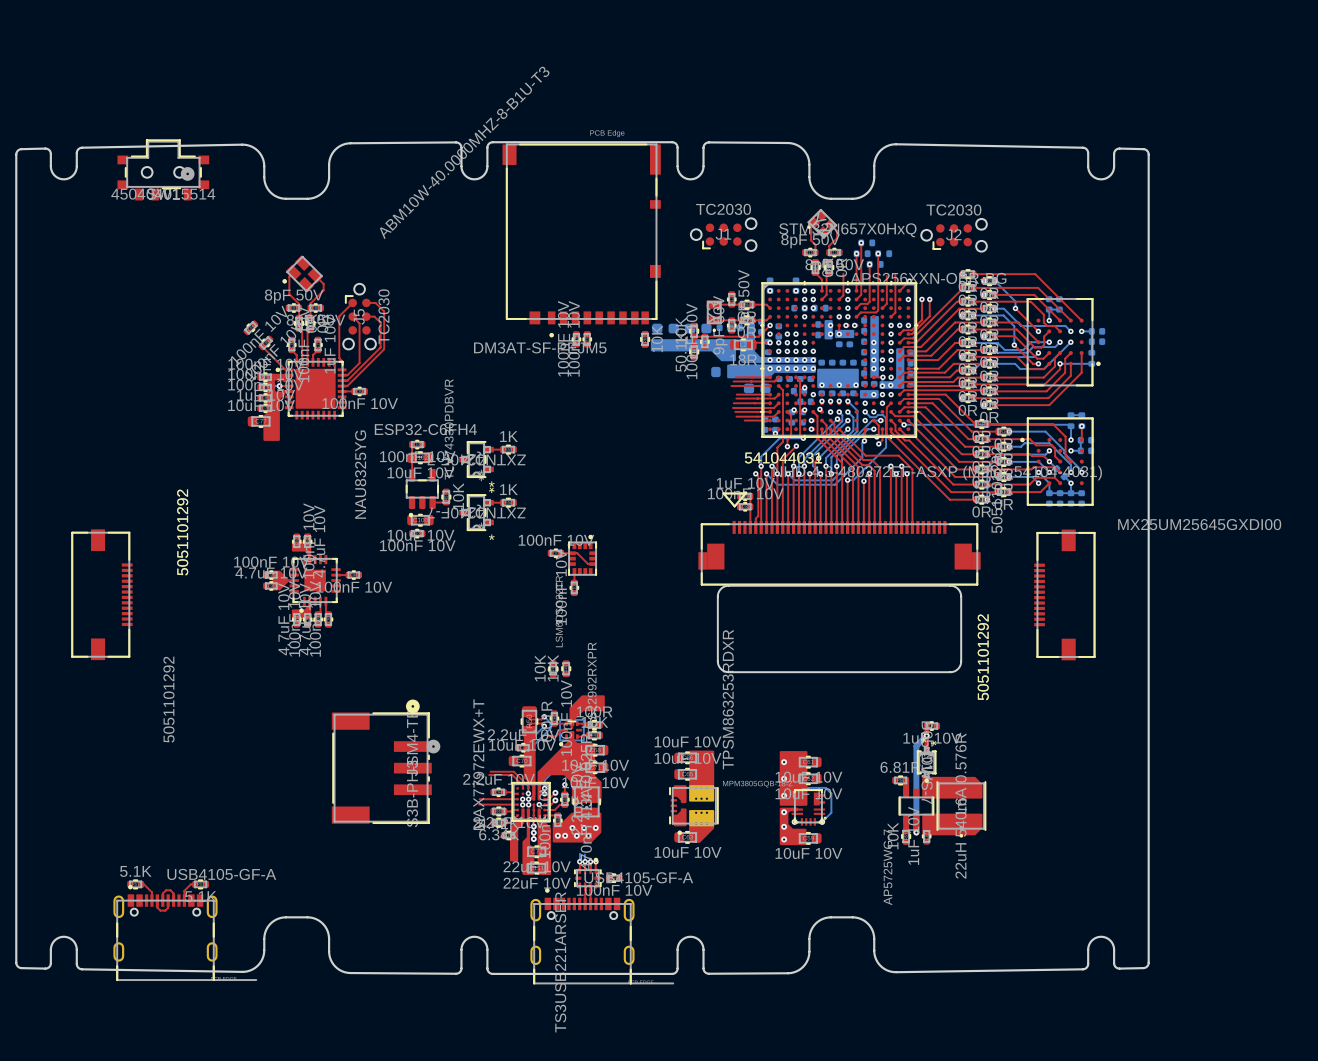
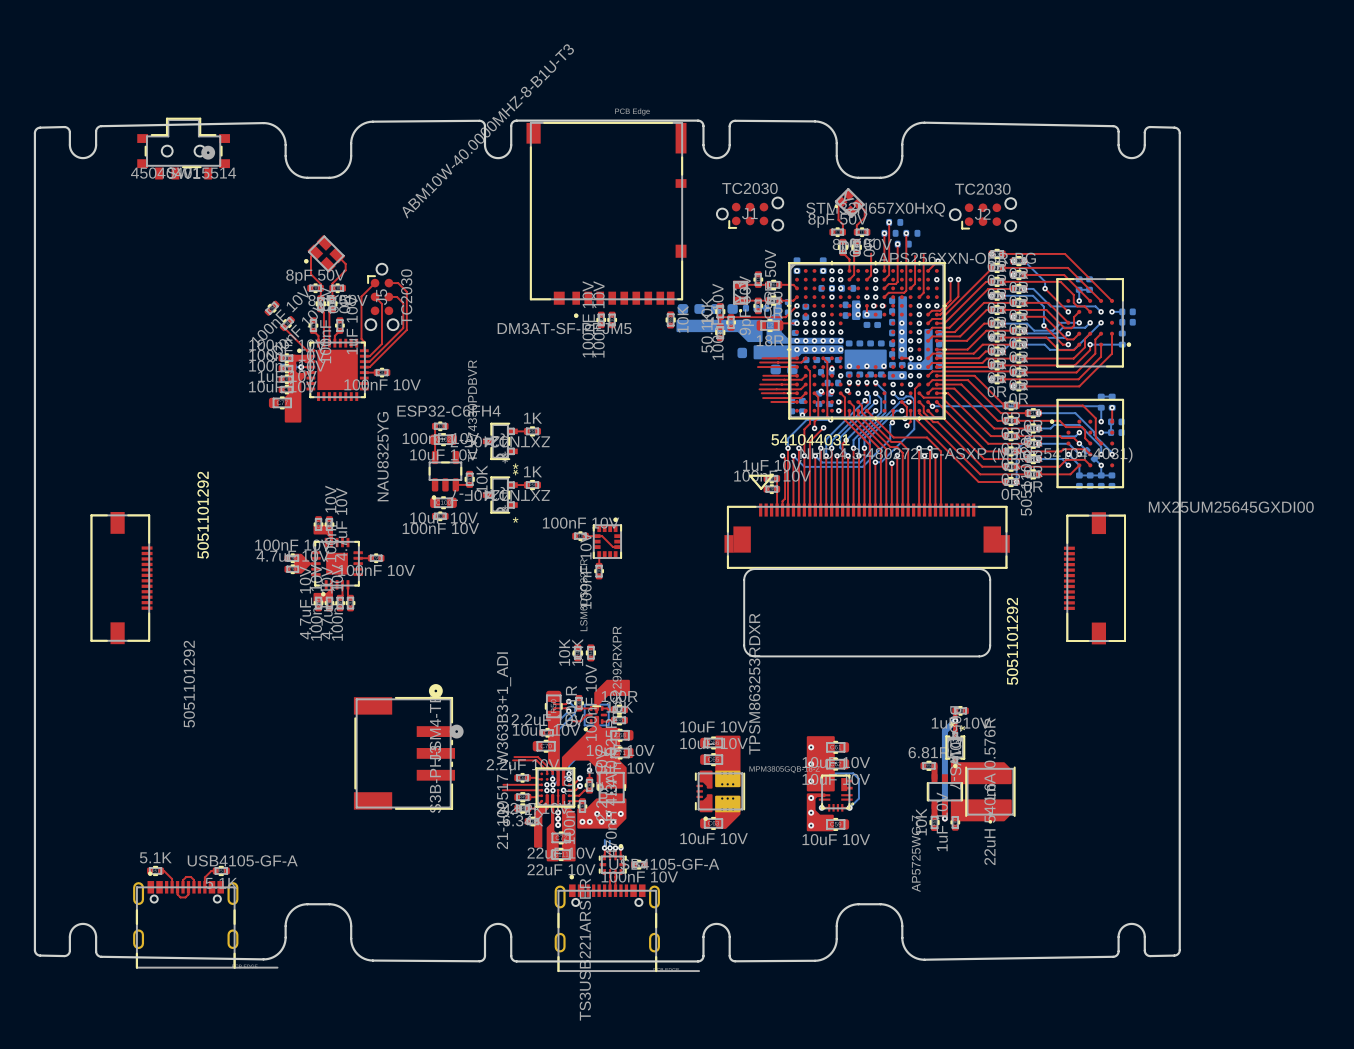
part value: MAX77972EWX+T (478, 764) -> 21-100517_W363B3+1_ADI (504, 750)

